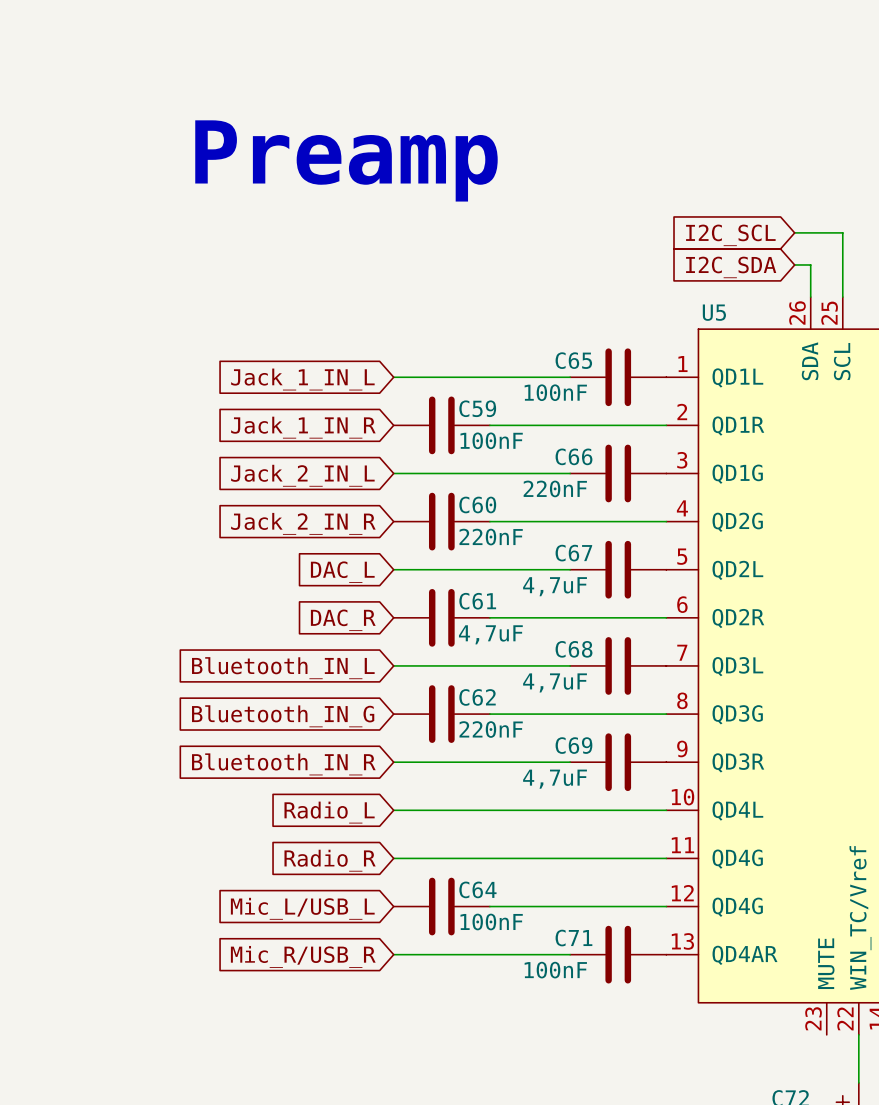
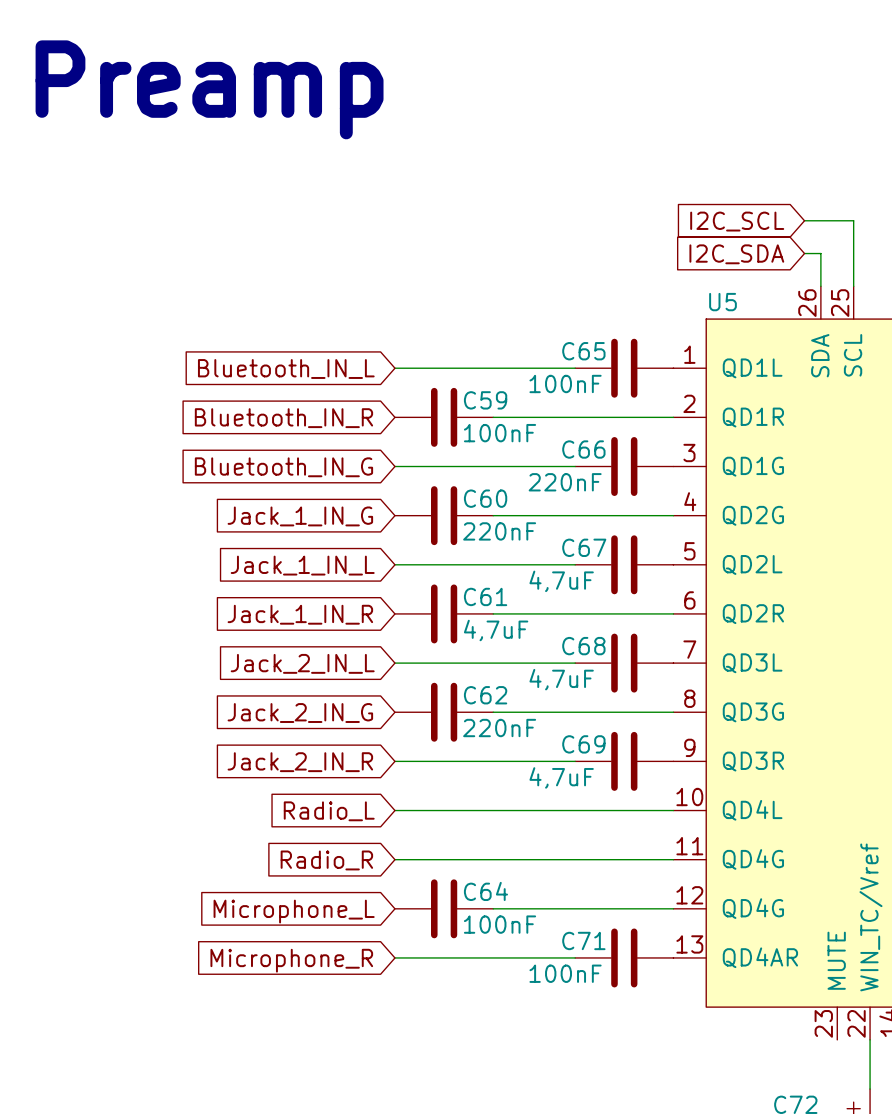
text position: Preamp (346, 160) -> Preamp (209, 89)
global label: Jack_1_IN_L (302, 379) -> Bluetooth_IN_L (286, 368)
global label: Jack_1_IN_R (303, 427) -> Bluetooth_IN_R (283, 418)
global label: Jack_2_IN_L (302, 475) -> Bluetooth_IN_G (283, 467)
global label: Jack_2_IN_R (303, 523) -> Jack_1_IN_G (300, 516)
global label: DAC_L (342, 572) -> Jack_1_IN_L (302, 565)
global label: DAC_R (343, 620) -> Jack_1_IN_R (300, 614)
global label: Bluetooth_IN_L (283, 668) -> Jack_2_IN_L (302, 663)
global label: Bluetooth_IN_G (283, 716) -> Jack_2_IN_G (300, 713)
global label: Bluetooth_IN_R (283, 764) -> Jack_2_IN_R (300, 762)
global label: Mic_L/USB_L (302, 908) -> Microphone_L (294, 911)
global label: Mic_R/USB_R (303, 956) -> Microphone_R (291, 960)

